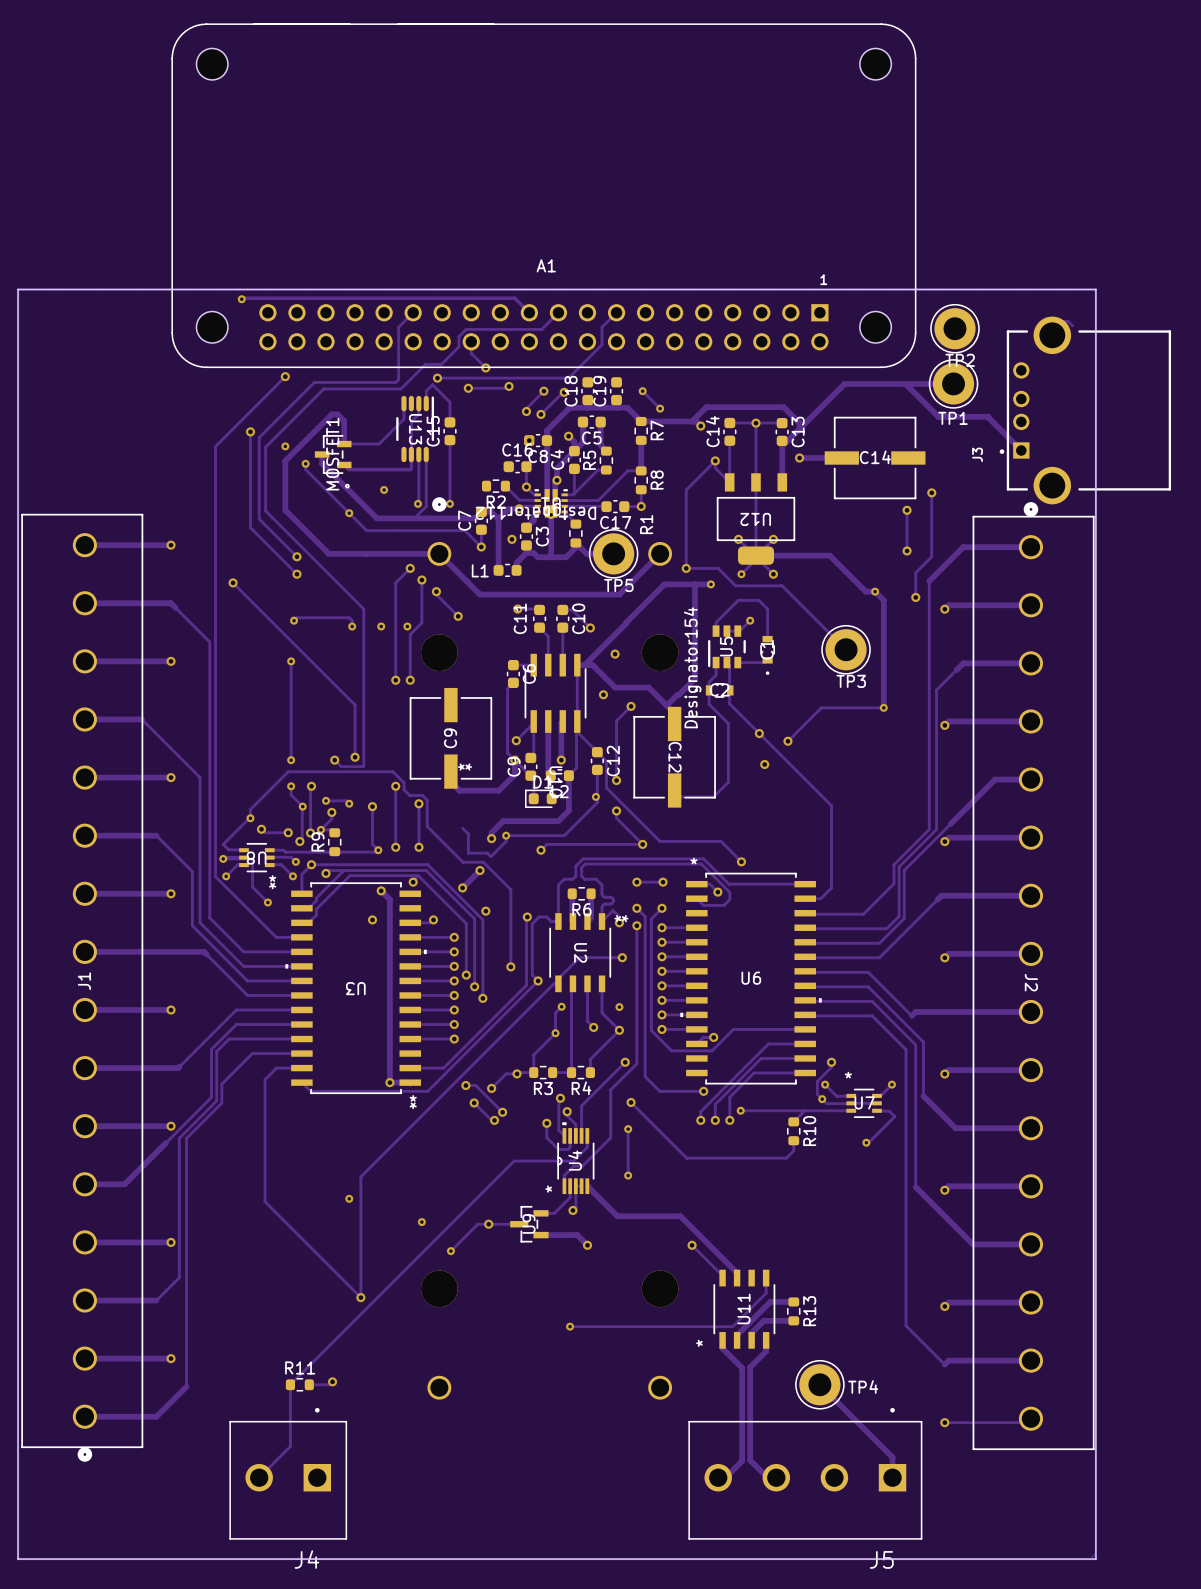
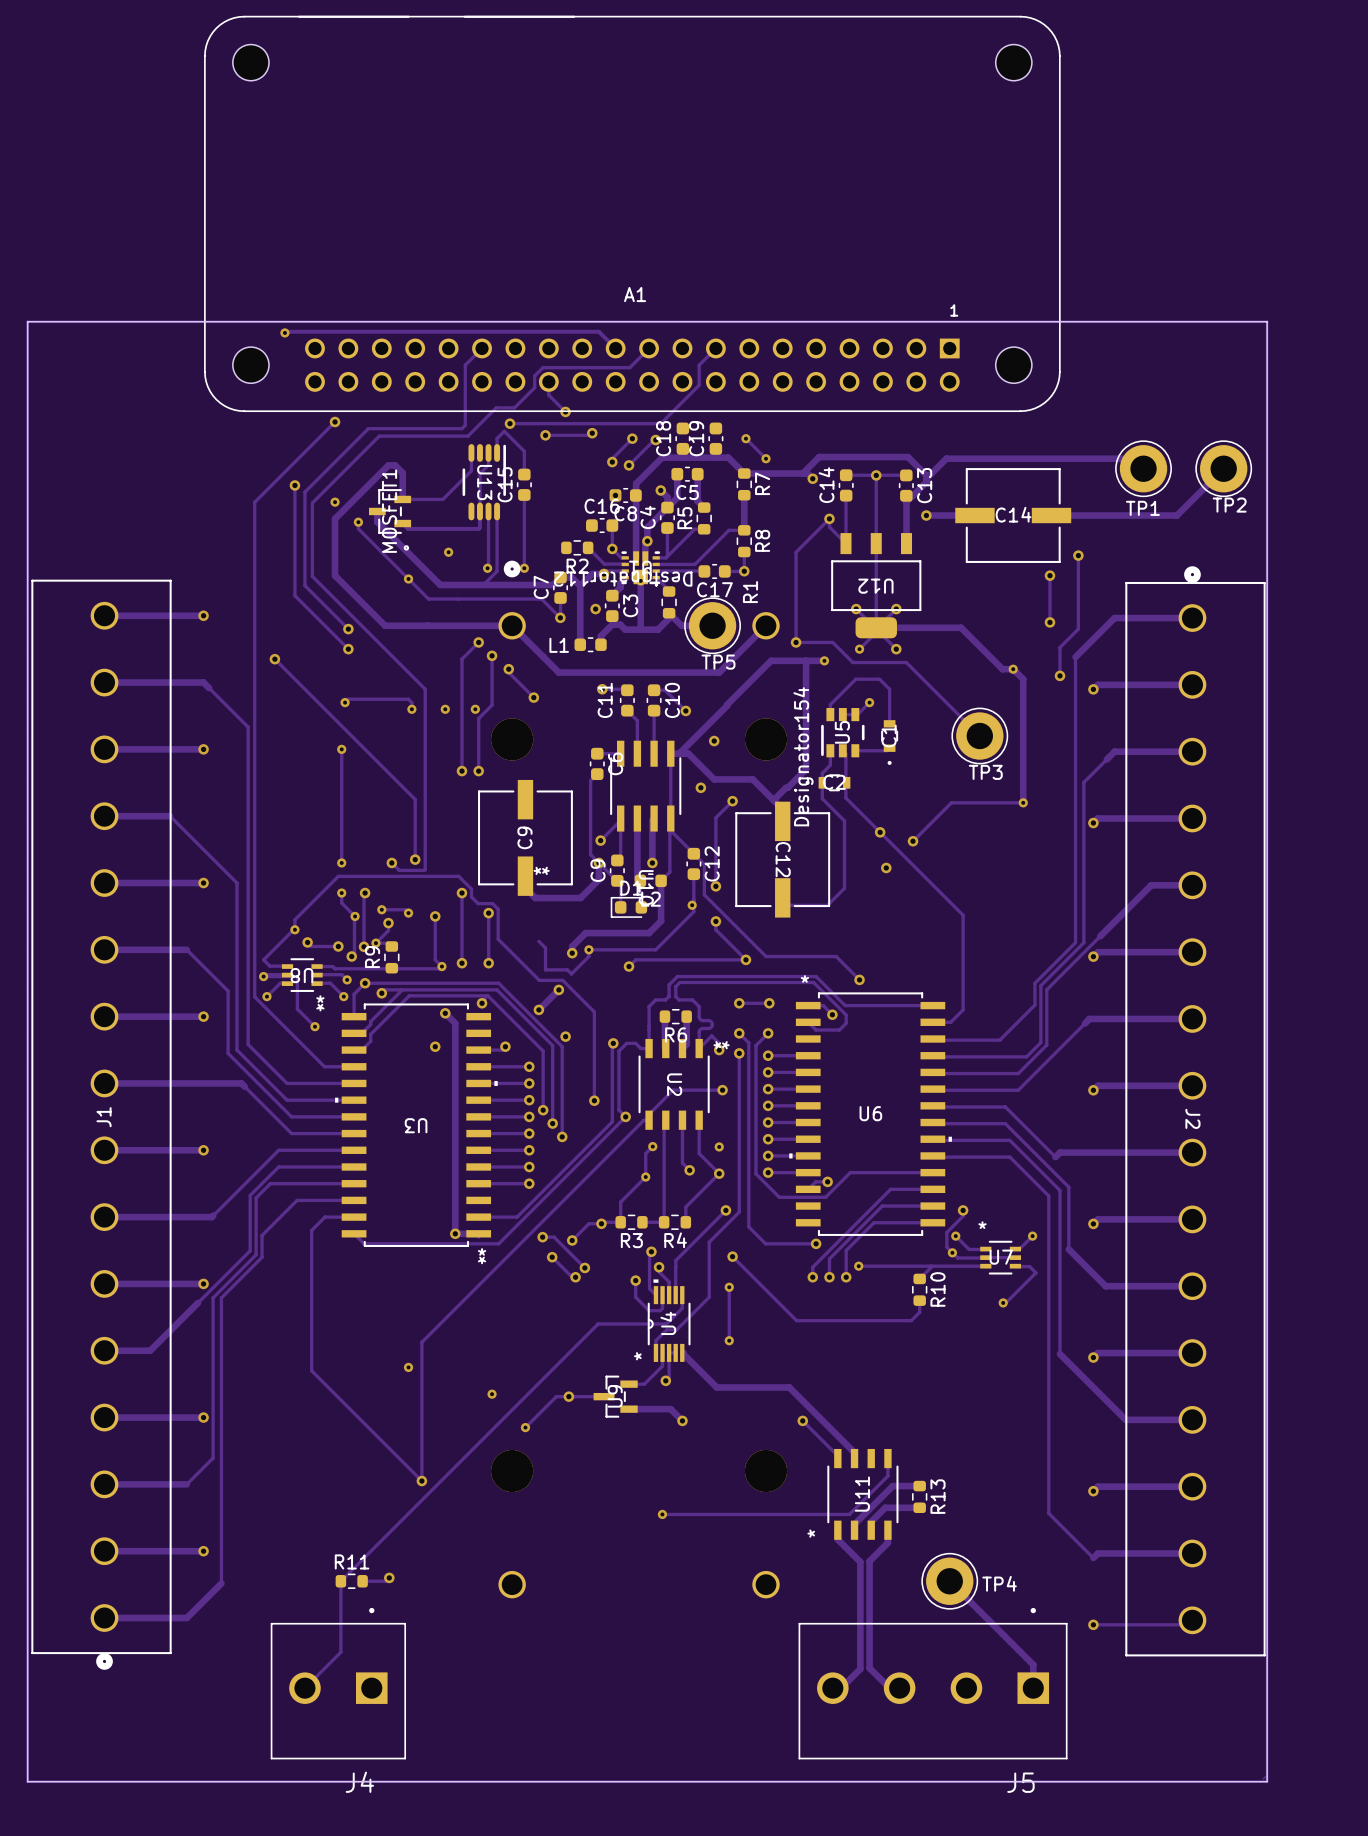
track: (1056, 321) (1068, 321) (1072, 325) -> none
TP2 position: (954, 328) -> (1223, 468)
track: (905, 383) (938, 416) (988, 416) (1021, 450) -> none
track: (953, 383) (844, 383) (799, 428) -> none
TP1 position: (953, 383) -> (1143, 468)
J3: (1085, 410) -> none
track: none -> (1143, 468) (1133, 458) (946, 458) (926, 478)
track: none -> (1223, 468) (1176, 515) (1063, 515)

